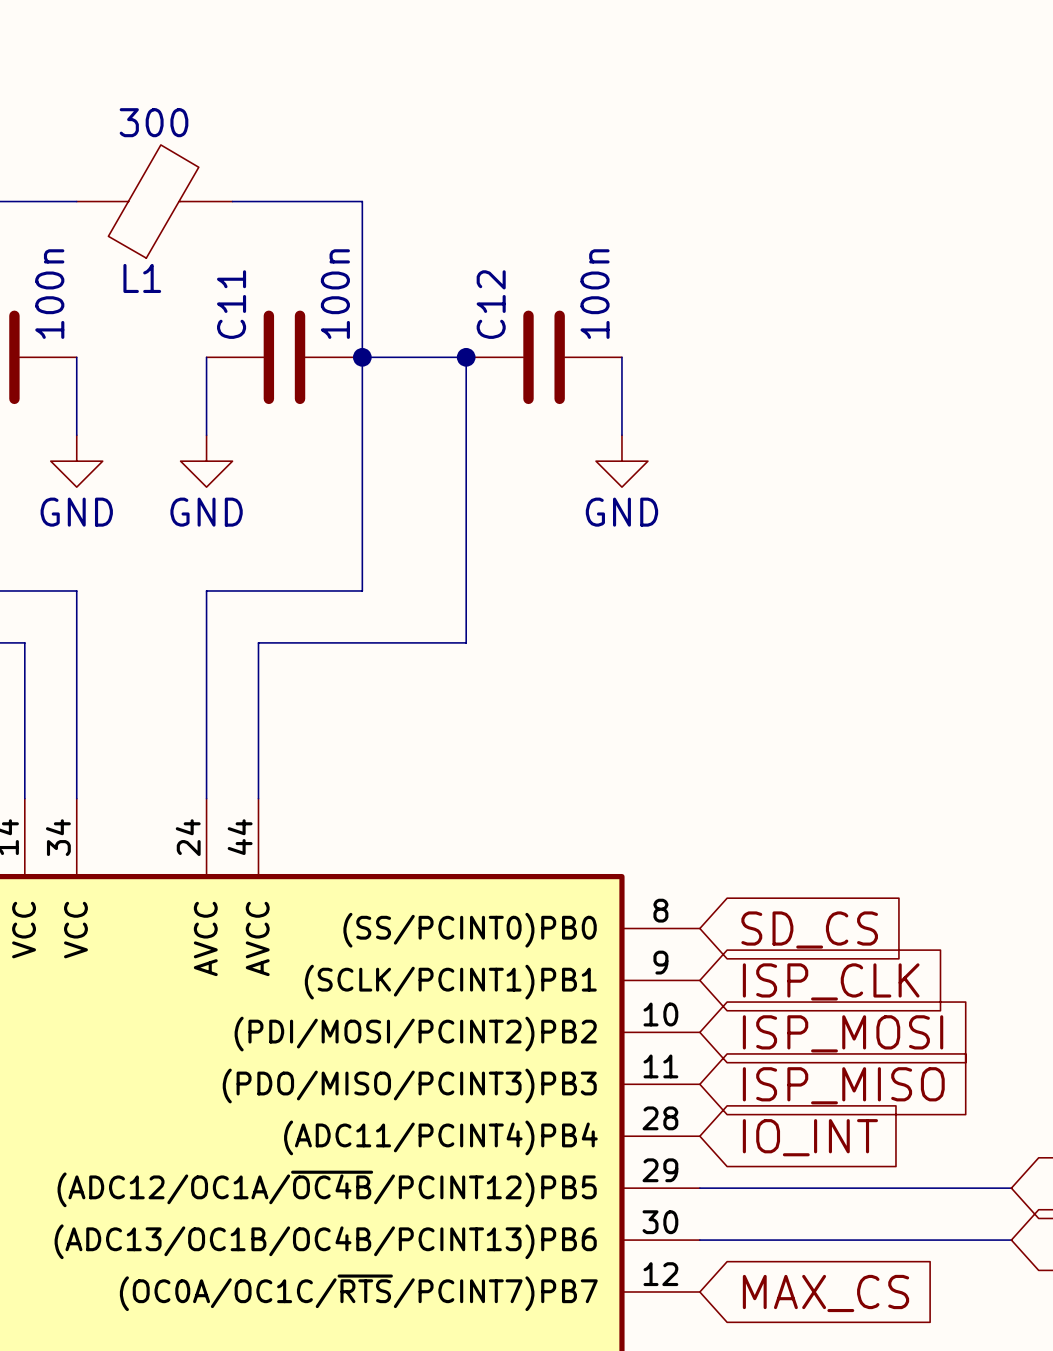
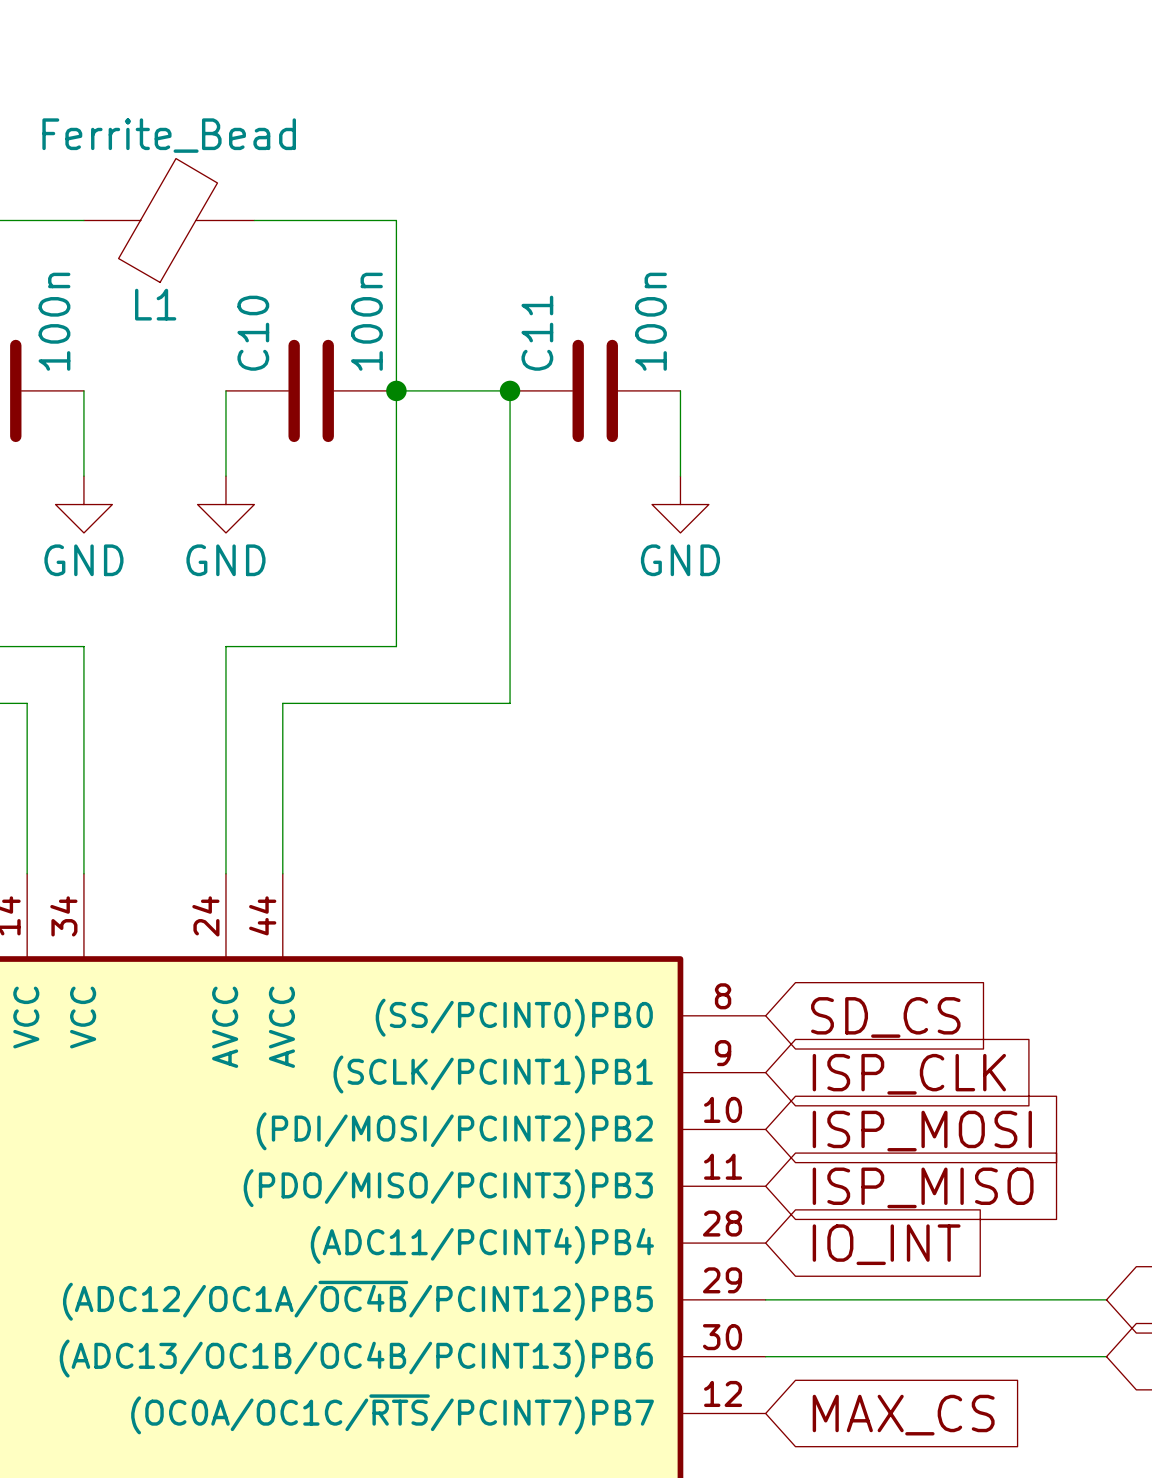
L1 value: 300 (154, 122) -> Ferrite_Bead (169, 135)
C11 name: C11 (231, 304) -> C10 (253, 333)
C12 name: C12 (491, 304) -> C11 (537, 333)

